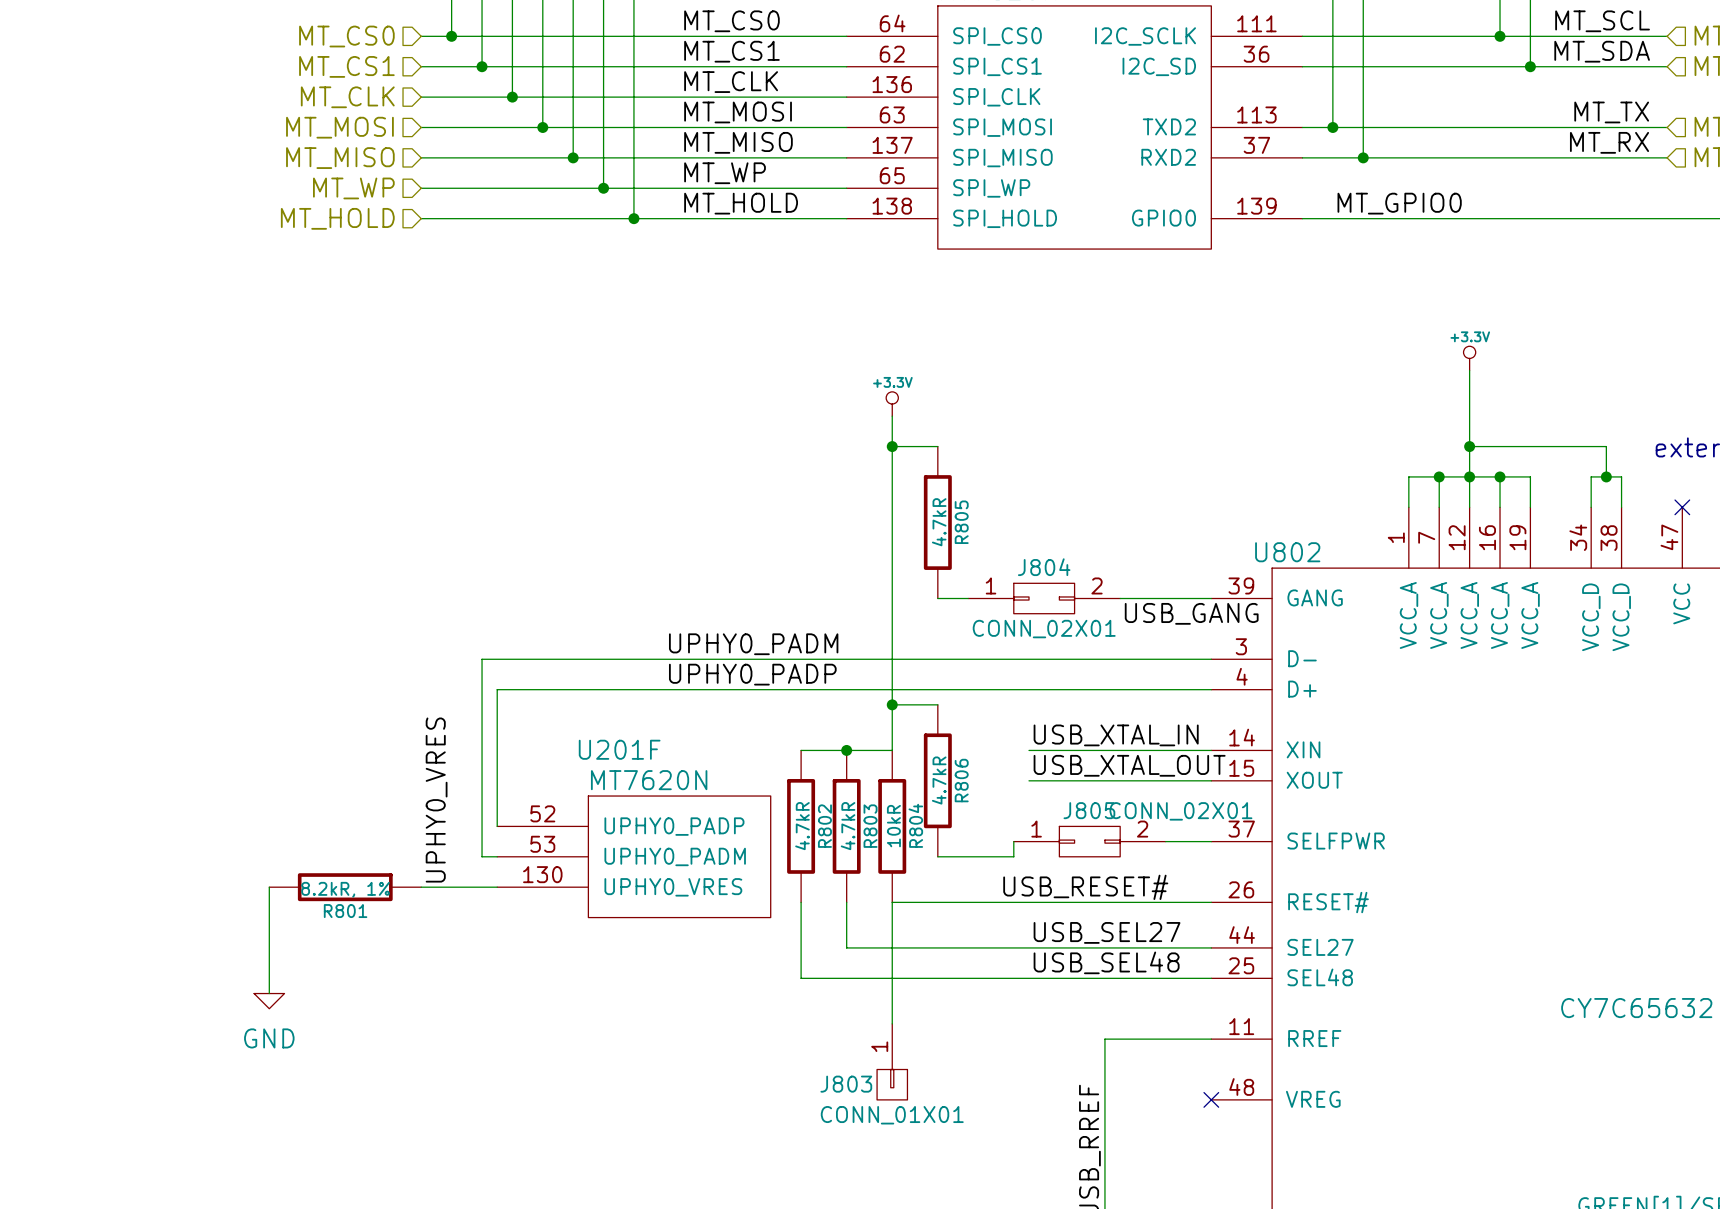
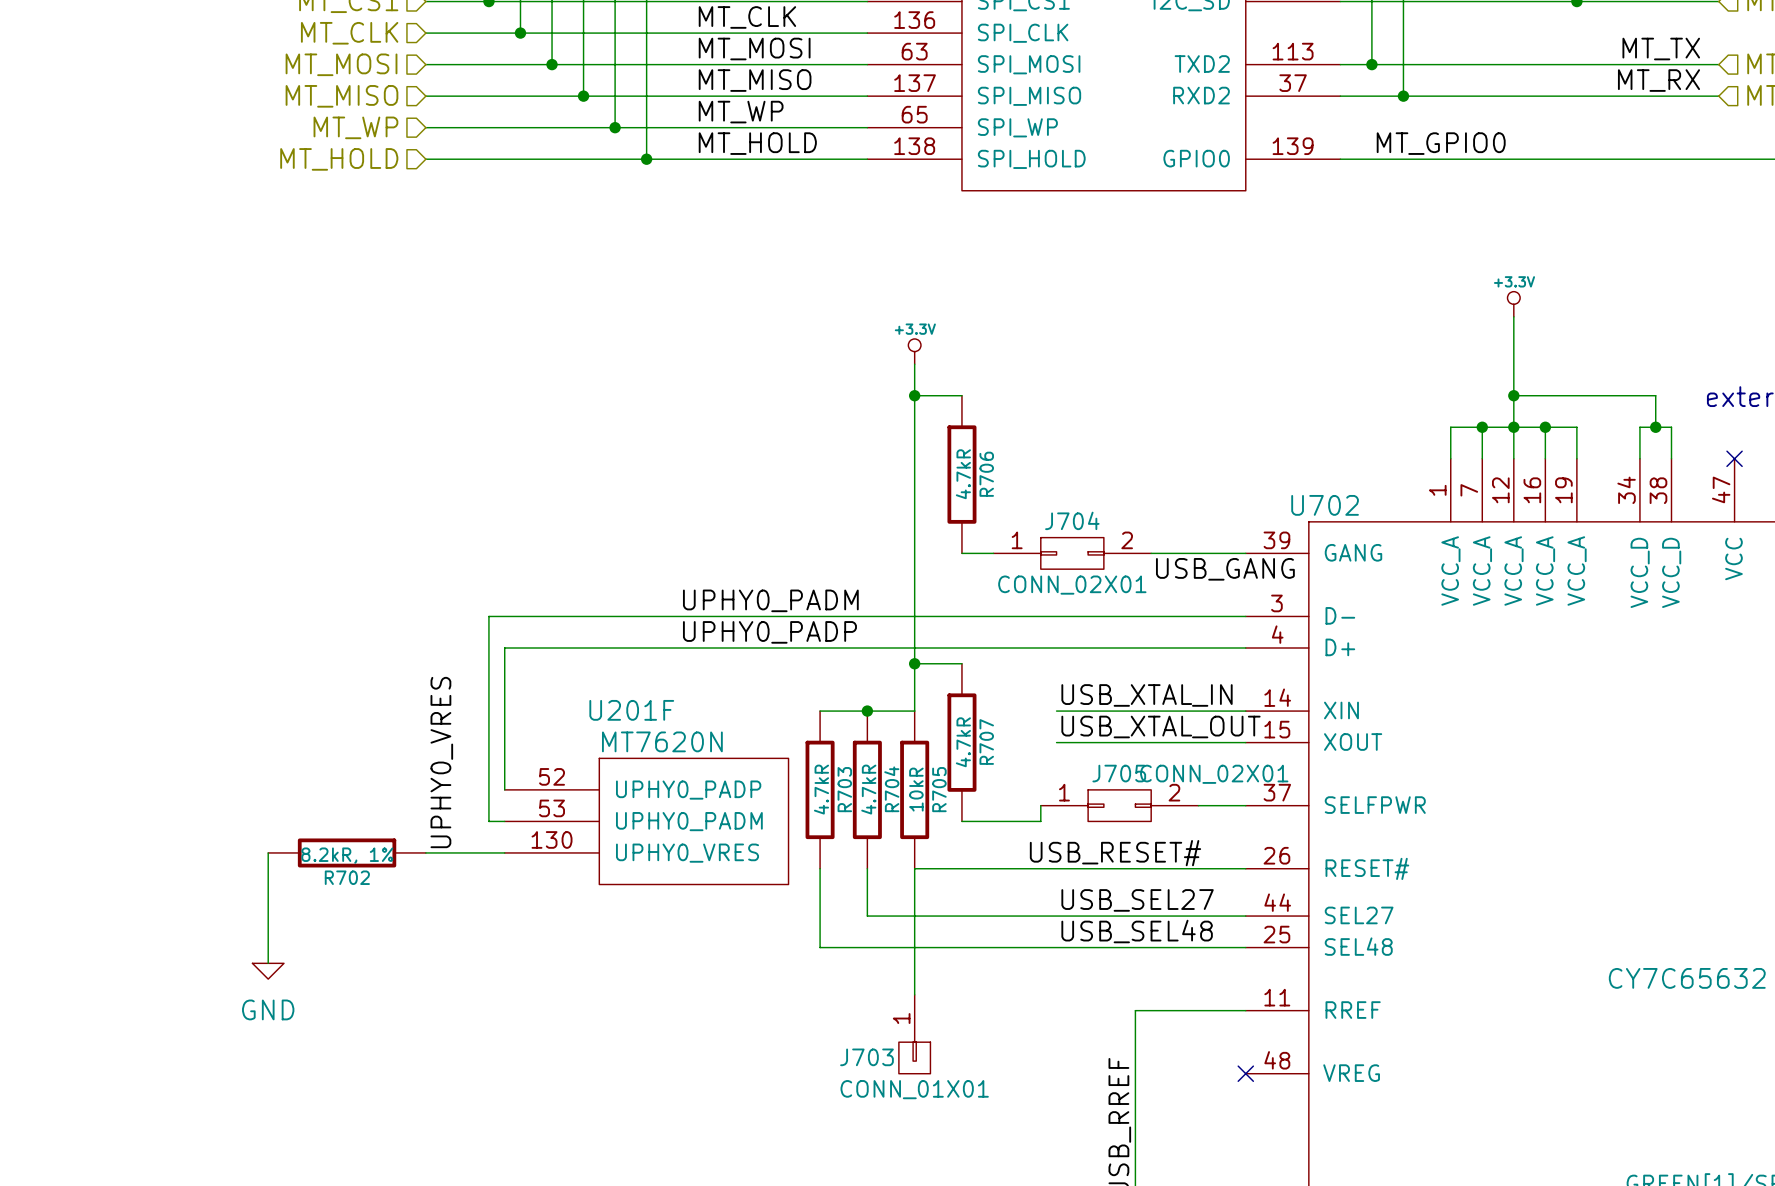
R805 name: R805 (961, 522) -> R706 (986, 474)
U802 name: U802 (1287, 552) -> U702 (1325, 505)
J804 name: J804 (1044, 567) -> J704 (1072, 520)
R806 name: R806 (961, 780) -> R707 (986, 742)
J805 name: J805 (1089, 810) -> J705 (1119, 773)
R804 name: R804 (915, 825) -> R705 (939, 789)
R802 name: R802 (824, 826) -> R703 (844, 789)
R803 name: R803 (870, 826) -> R704 (891, 789)
R801 name: R801 (345, 911) -> R702 (347, 877)
J803 name: J803 (846, 1084) -> J703 (866, 1057)

